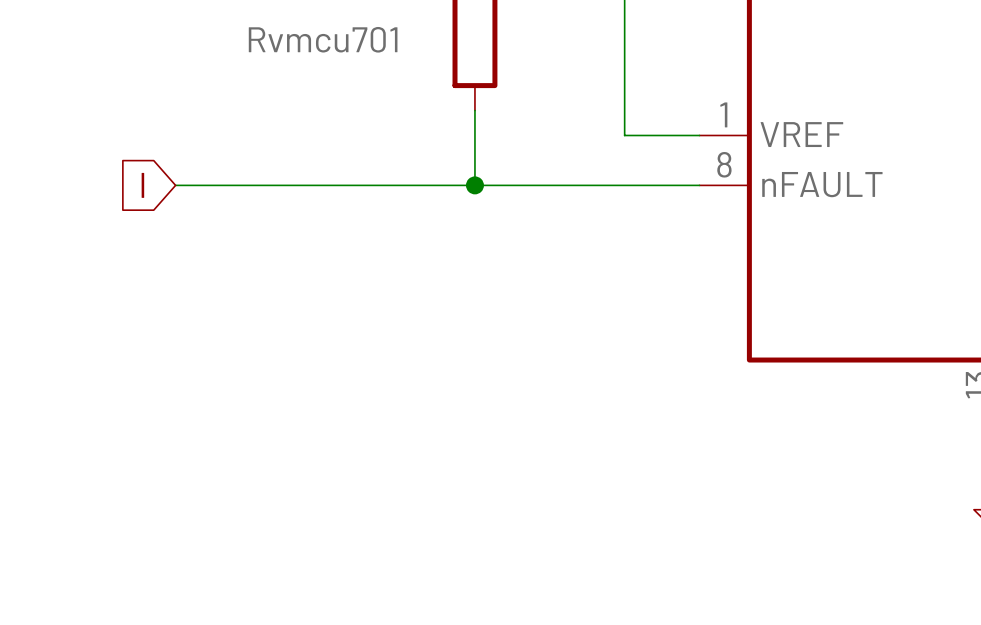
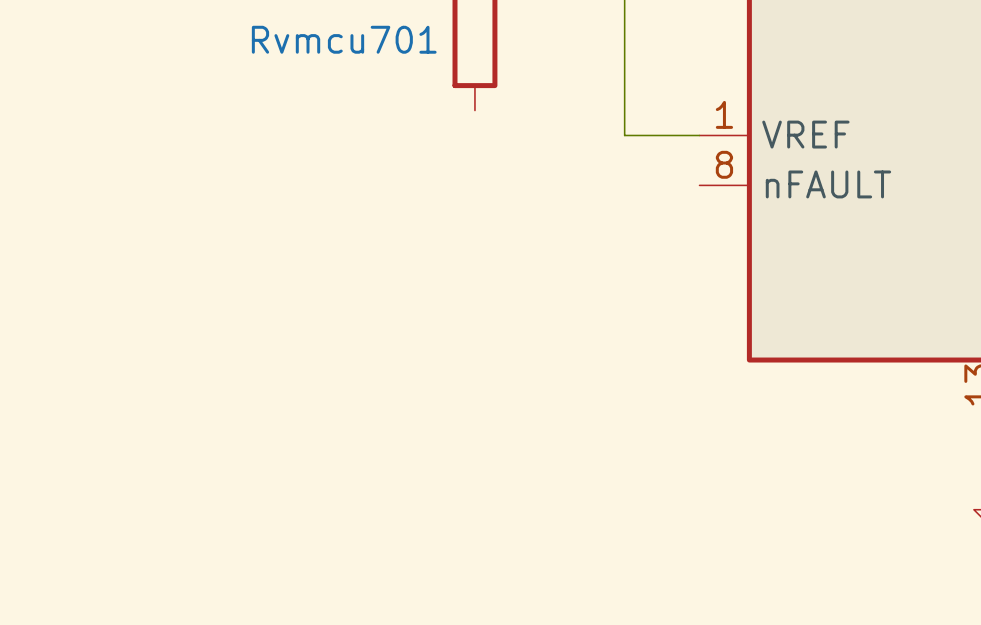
wire: (474, 110) (474, 185) -> none
global label: I (142, 185) -> none
wire: (175, 185) (699, 185) -> none
junction: (474, 185) -> none

